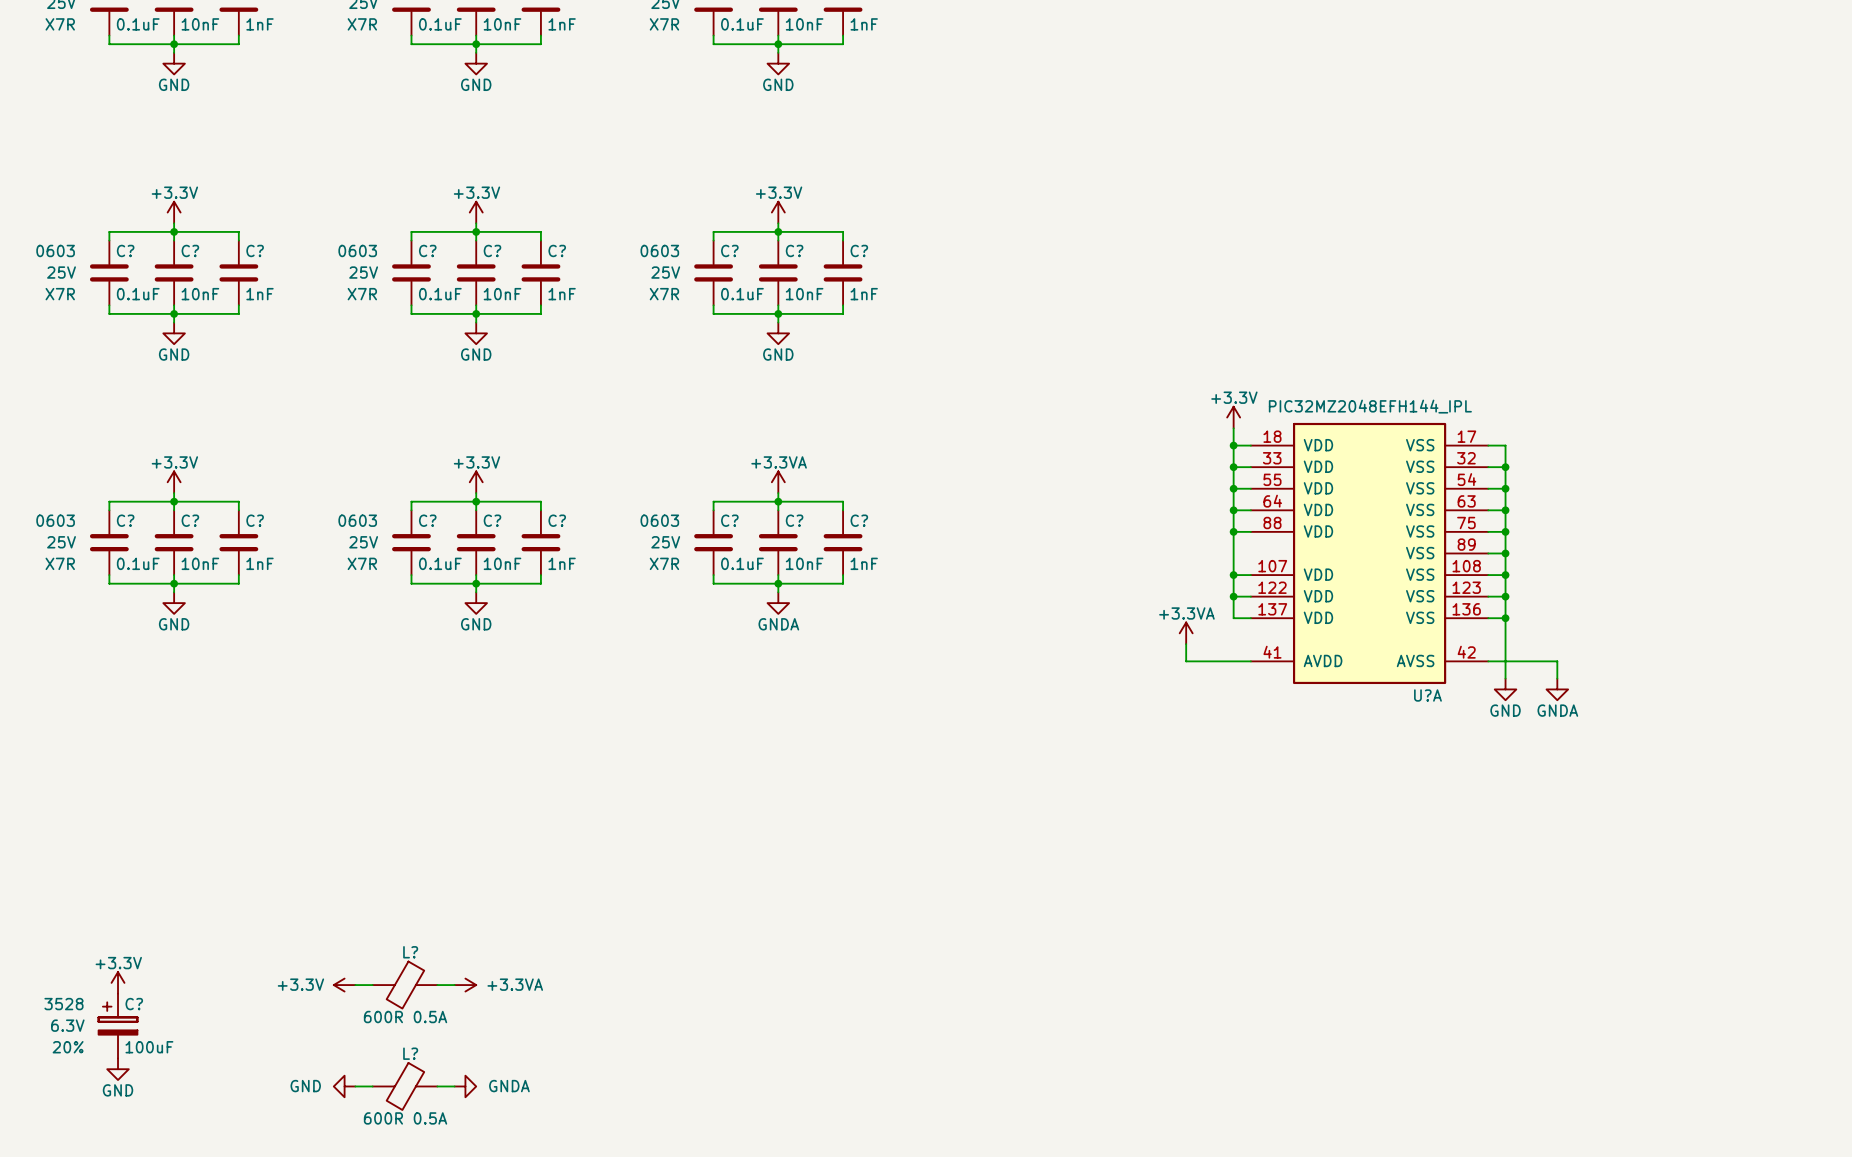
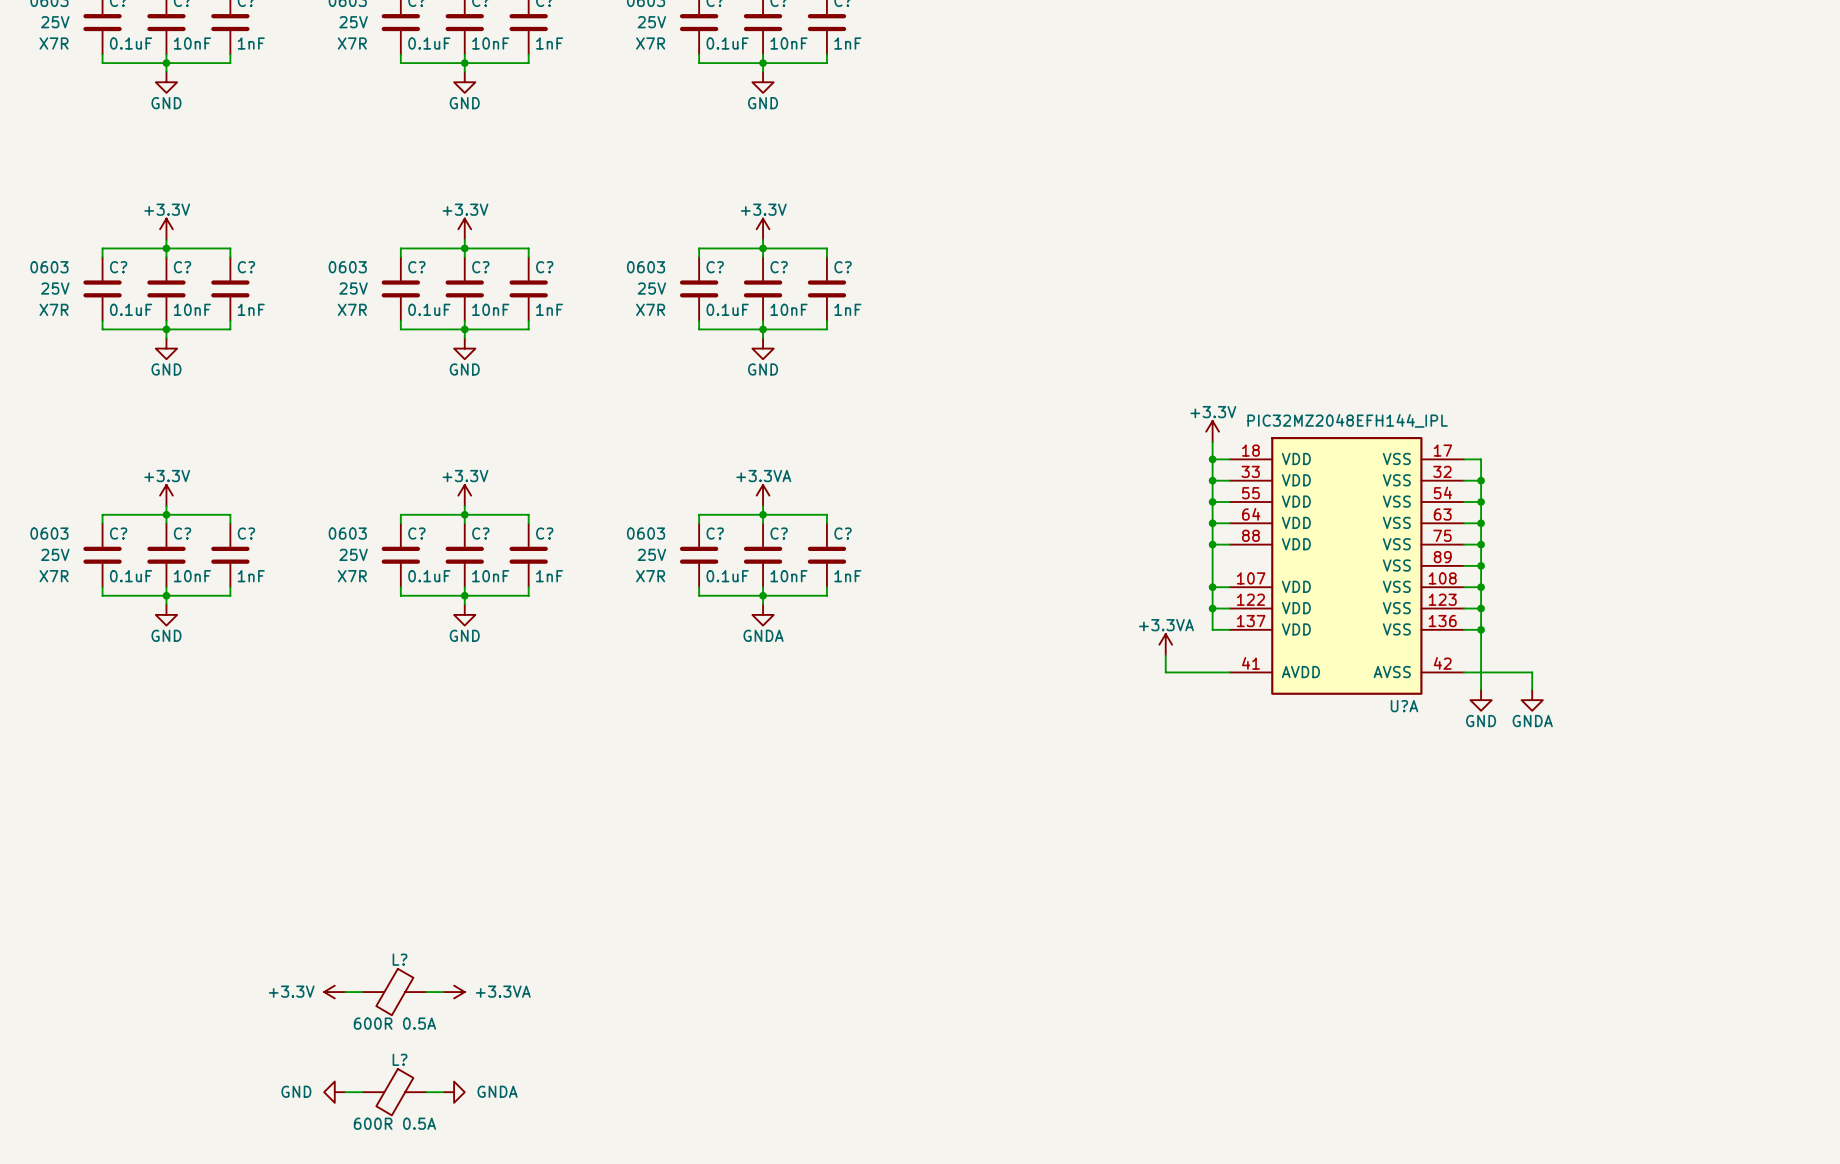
power symbol: +3.3V (118, 982) -> none
C?: 100uF (118, 1026) -> none
power symbol: GND (118, 1069) -> none

